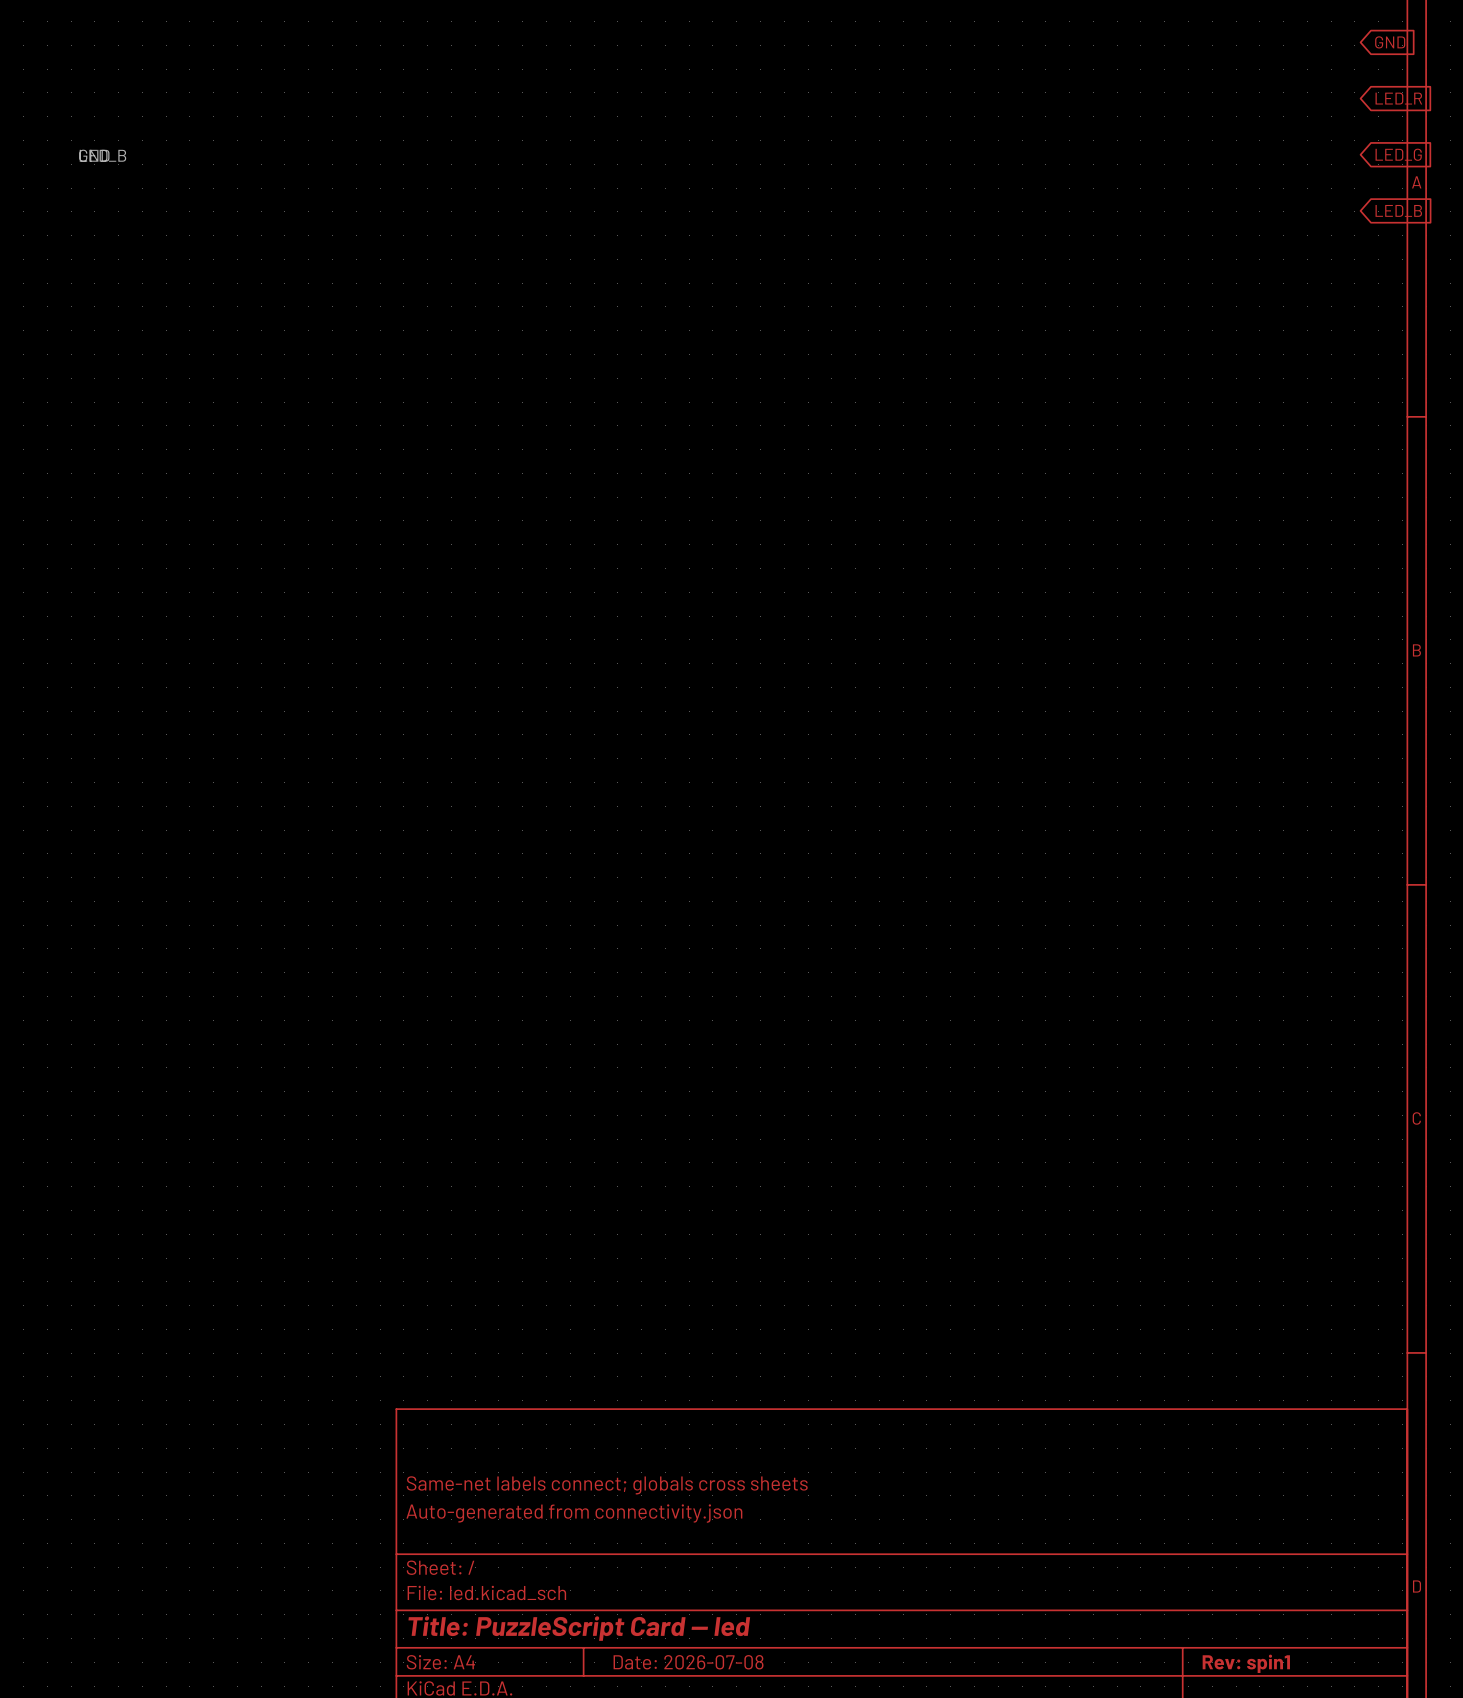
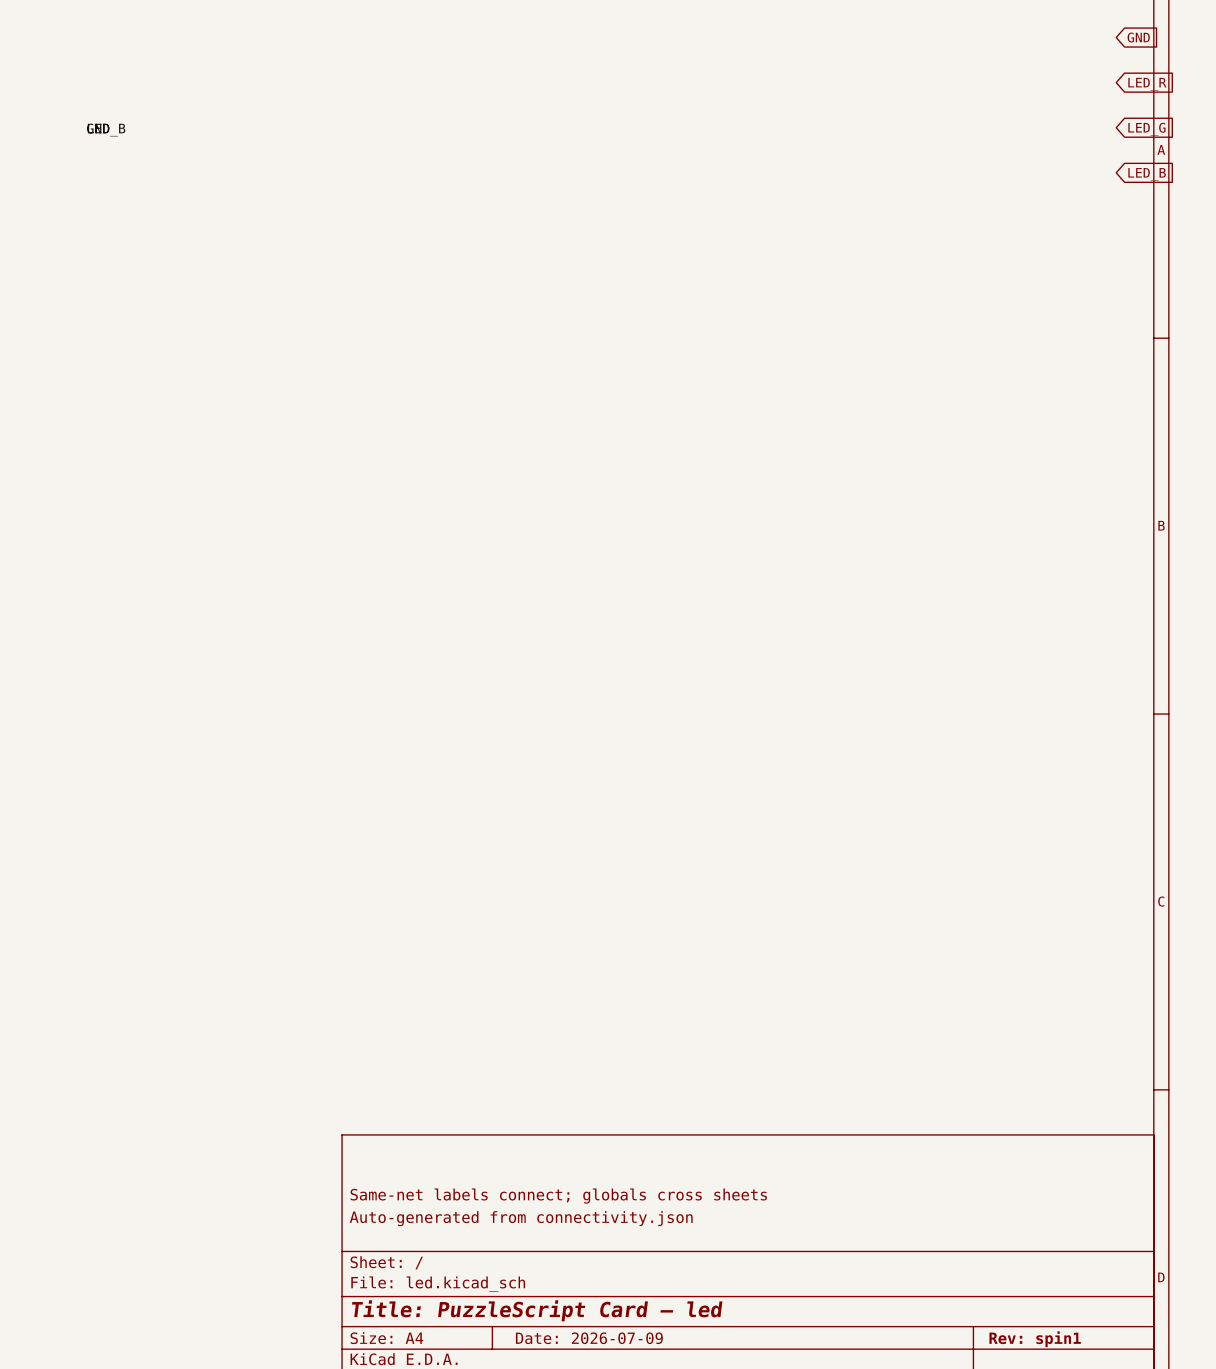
title block: Date: 2026-07-08 (688, 1662) -> Date: 2026-07-09 (589, 1338)

